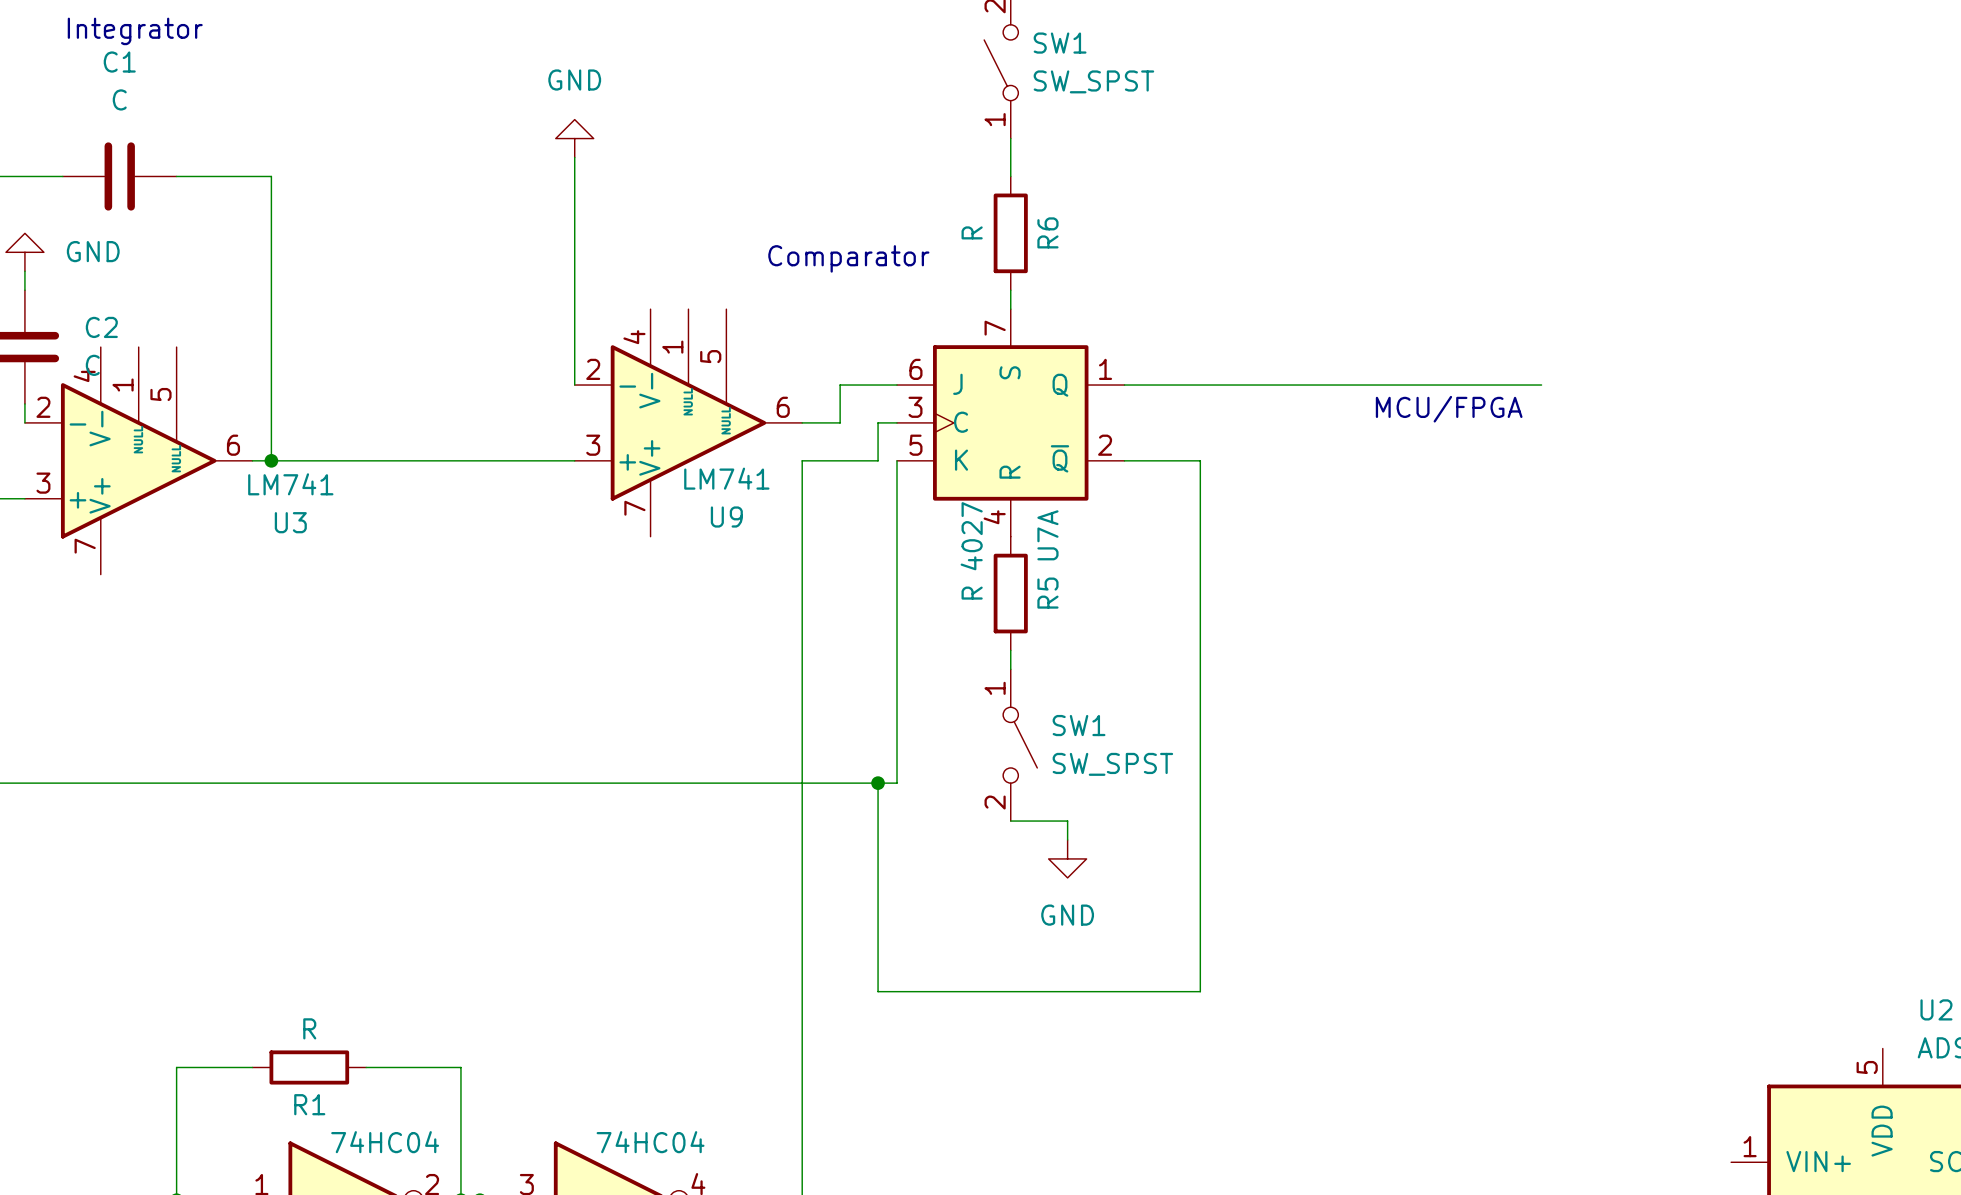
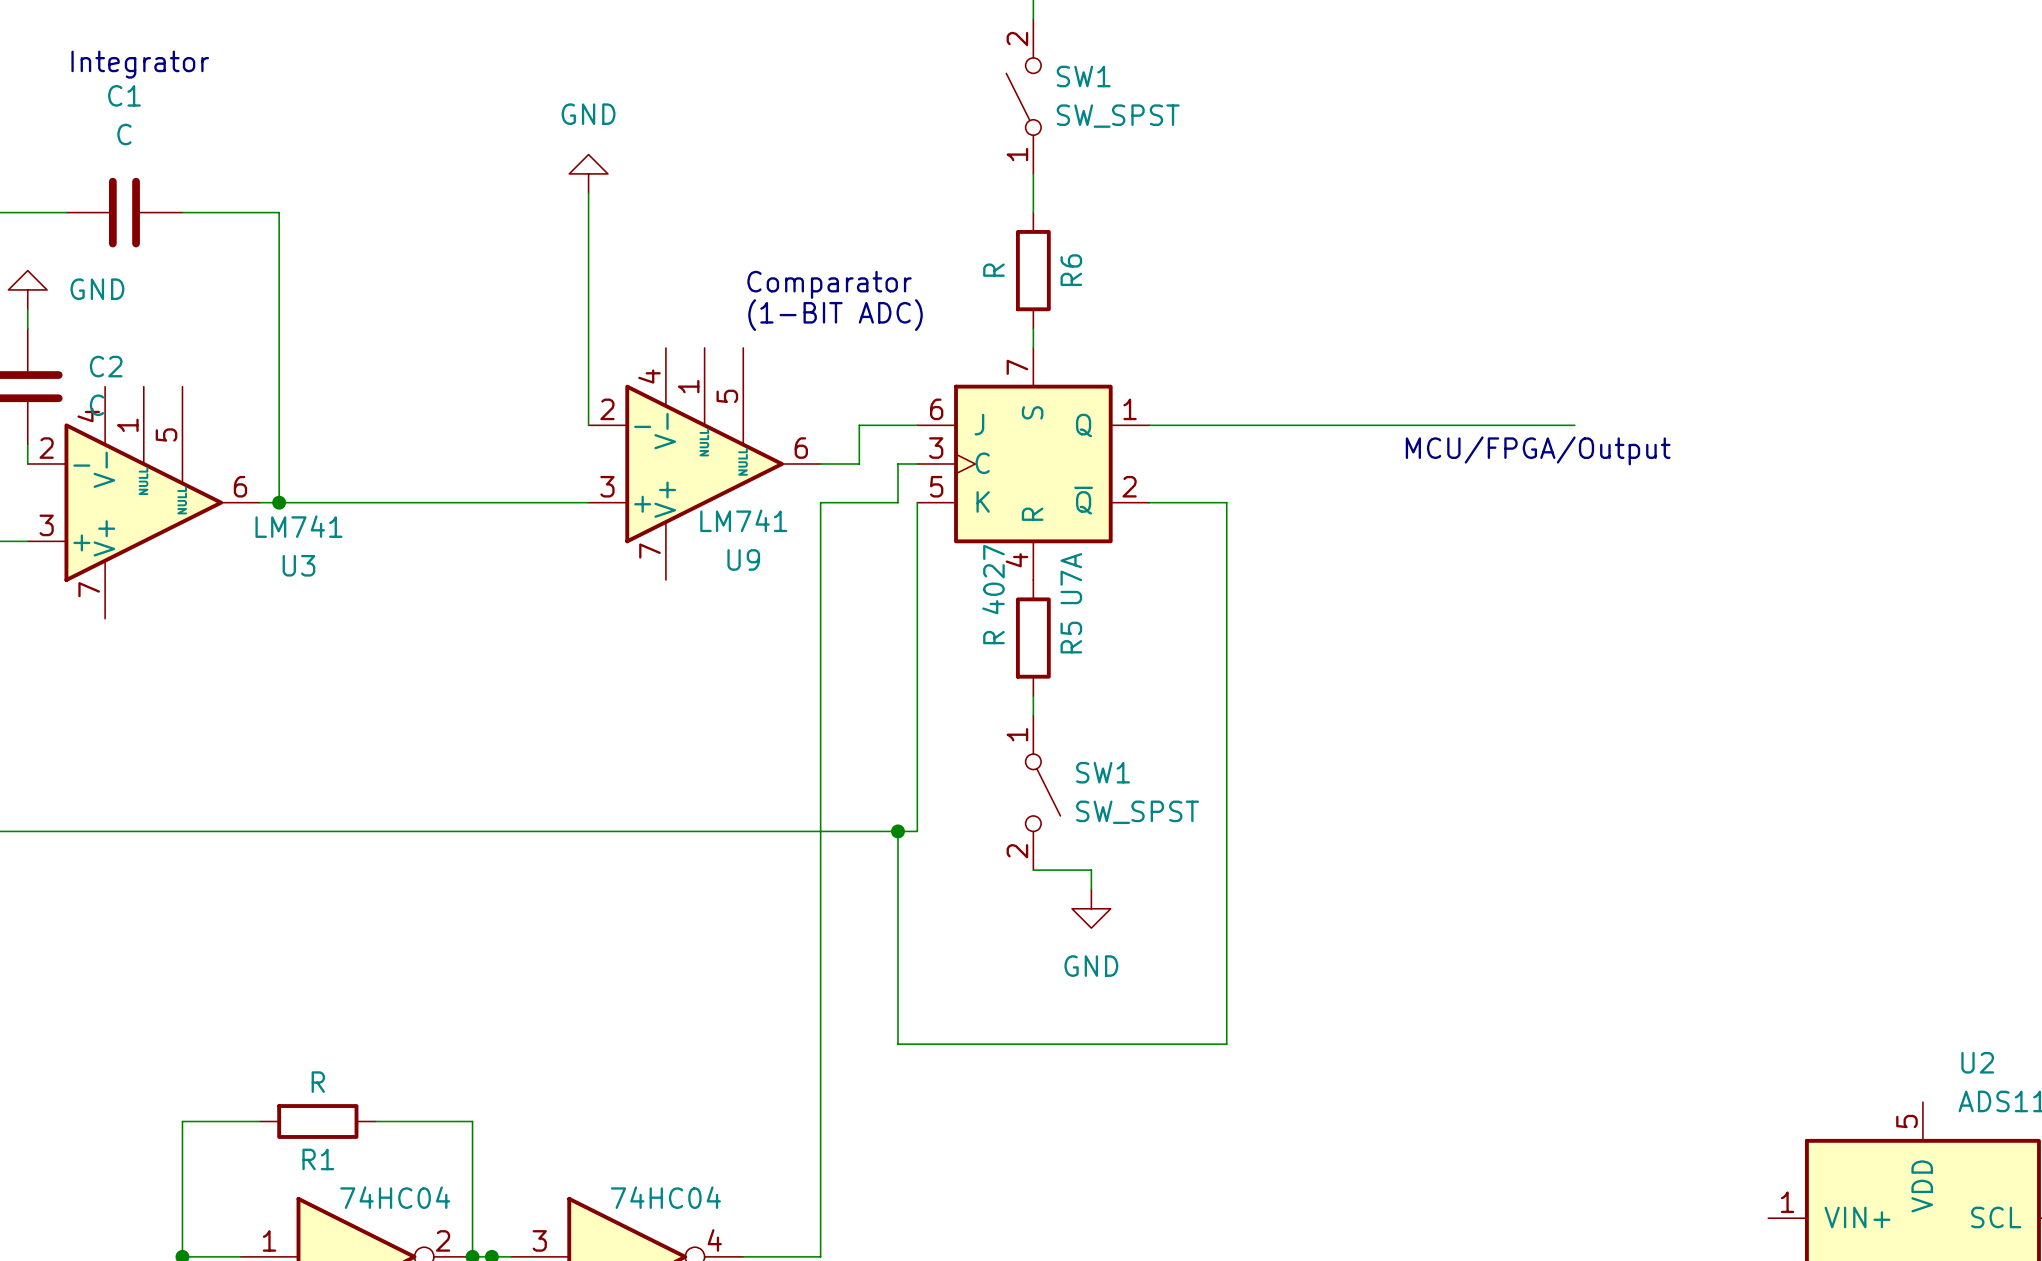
text position: Comparator (848, 258) -> Comparator (829, 284)
text: none -> (1-BIT ADC) (835, 315)
text: MCU/FPGA (1449, 409) -> MCU/FPGA/Output (1538, 450)

